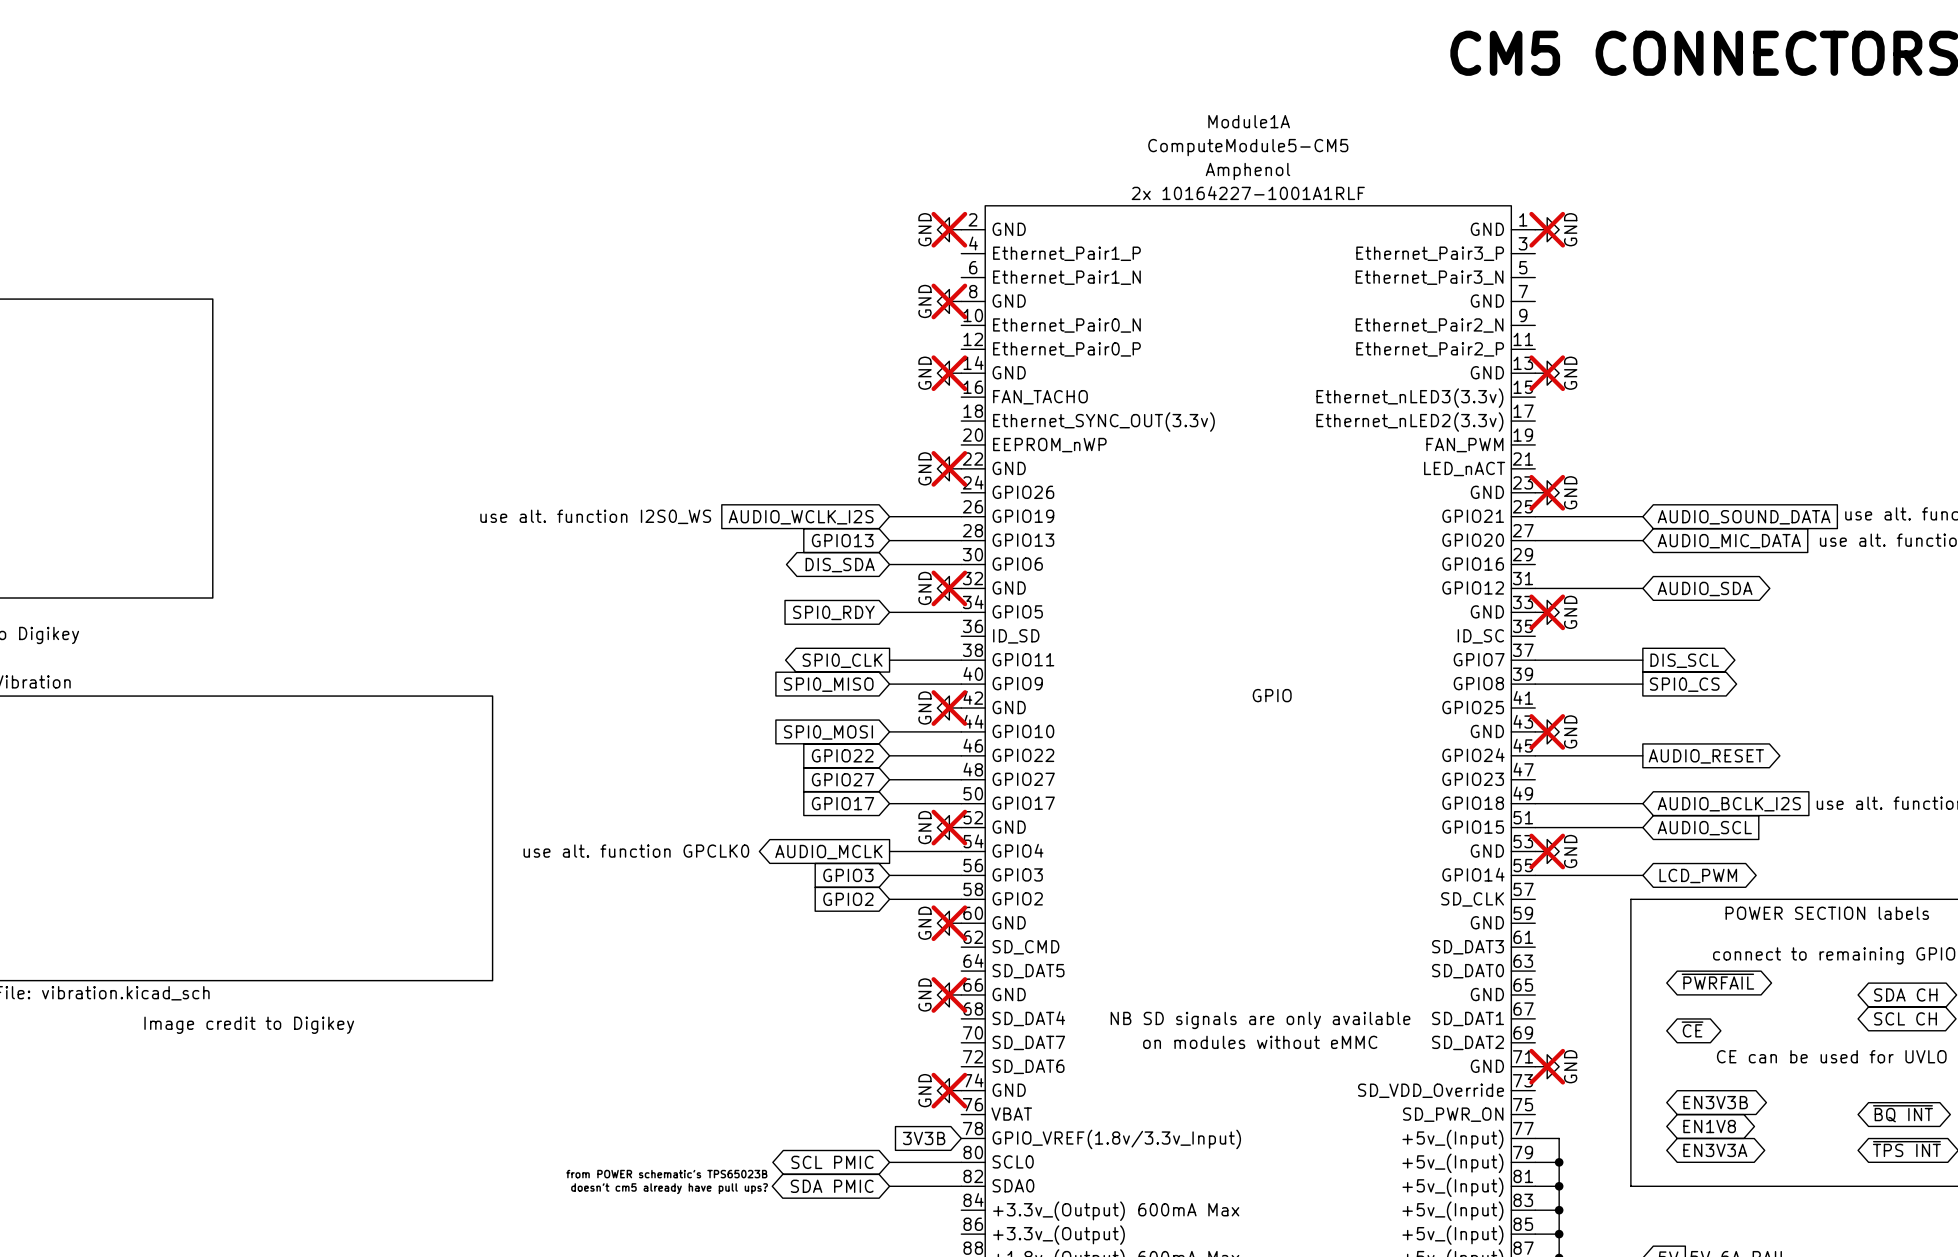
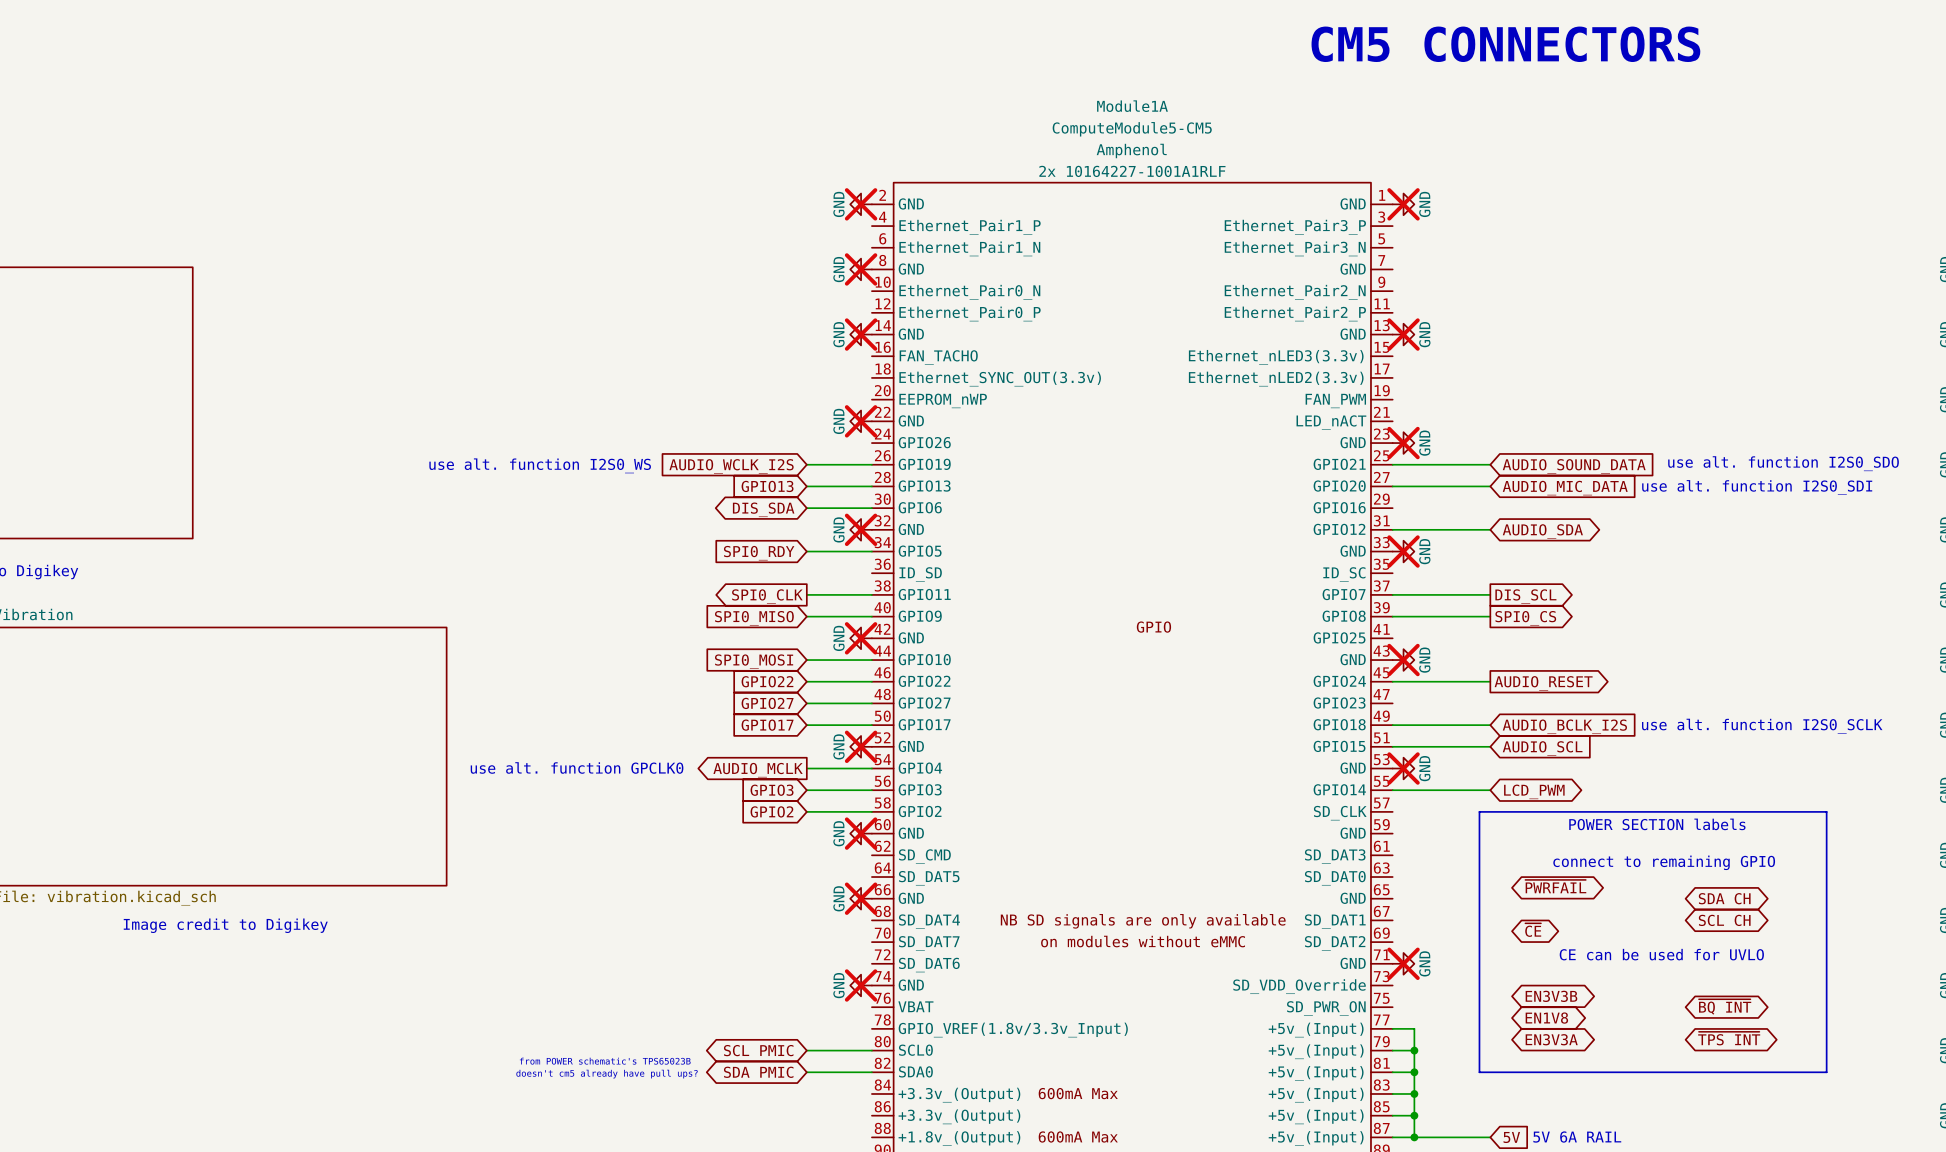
global label: 3V3B (924, 1138) -> none

